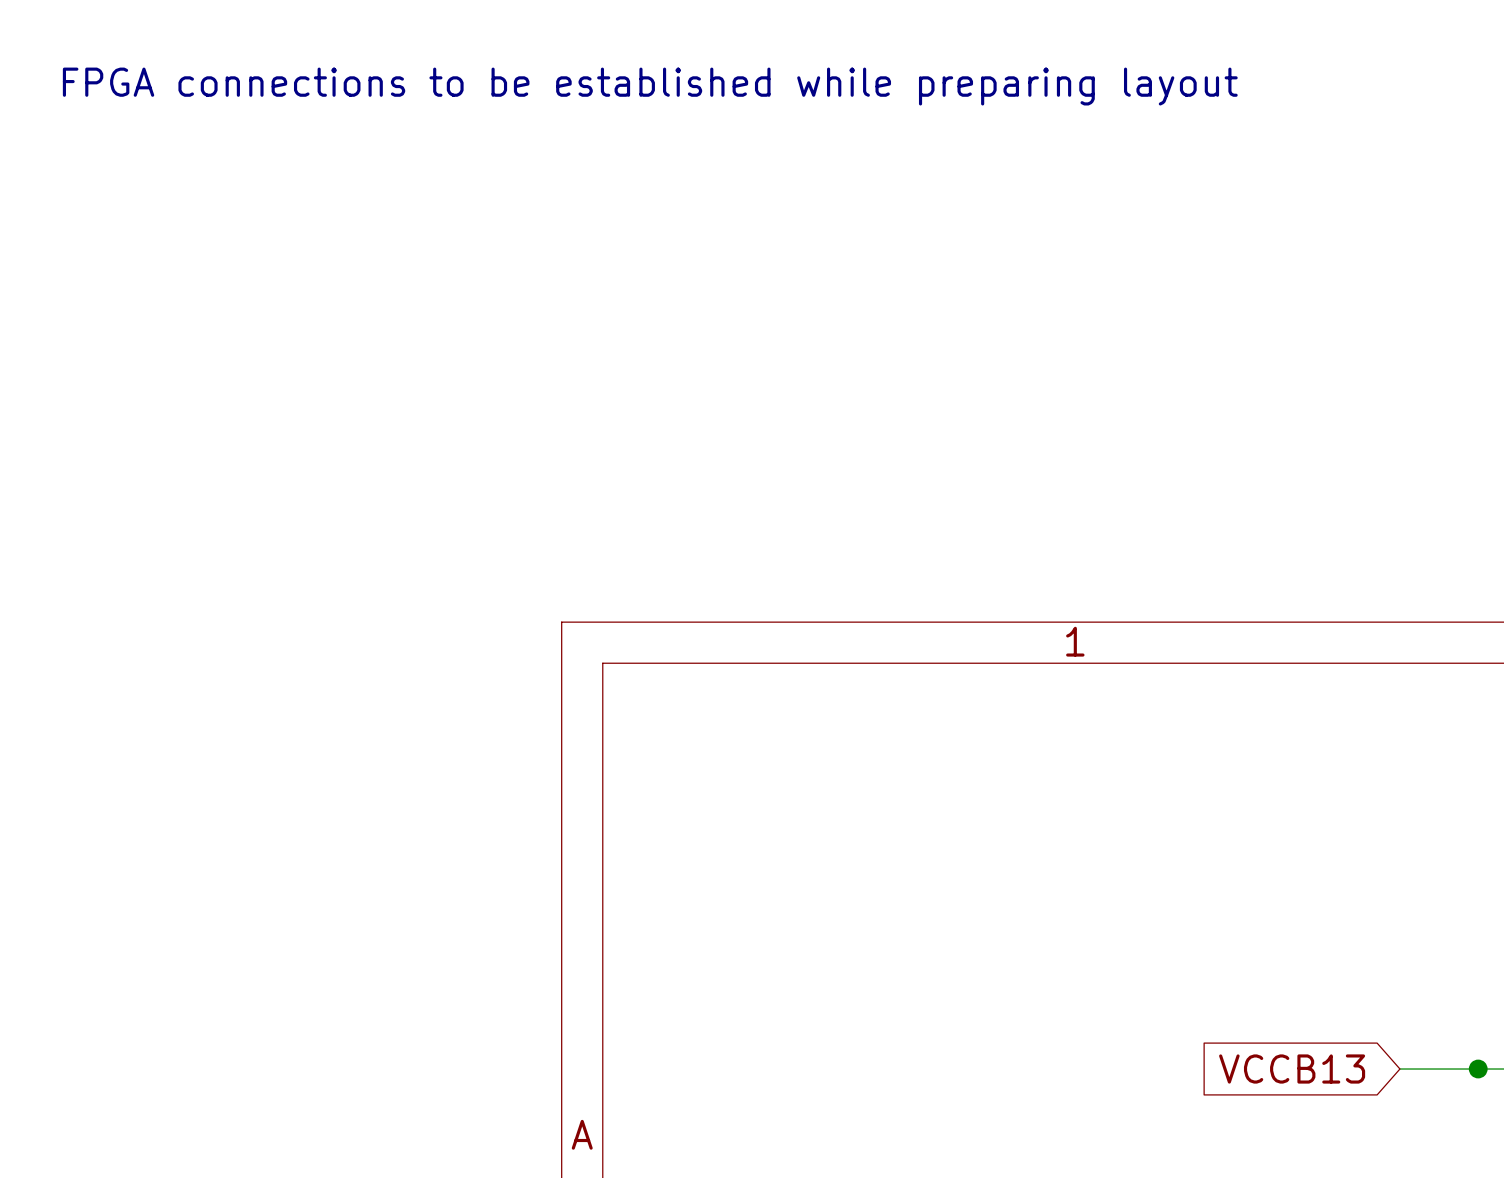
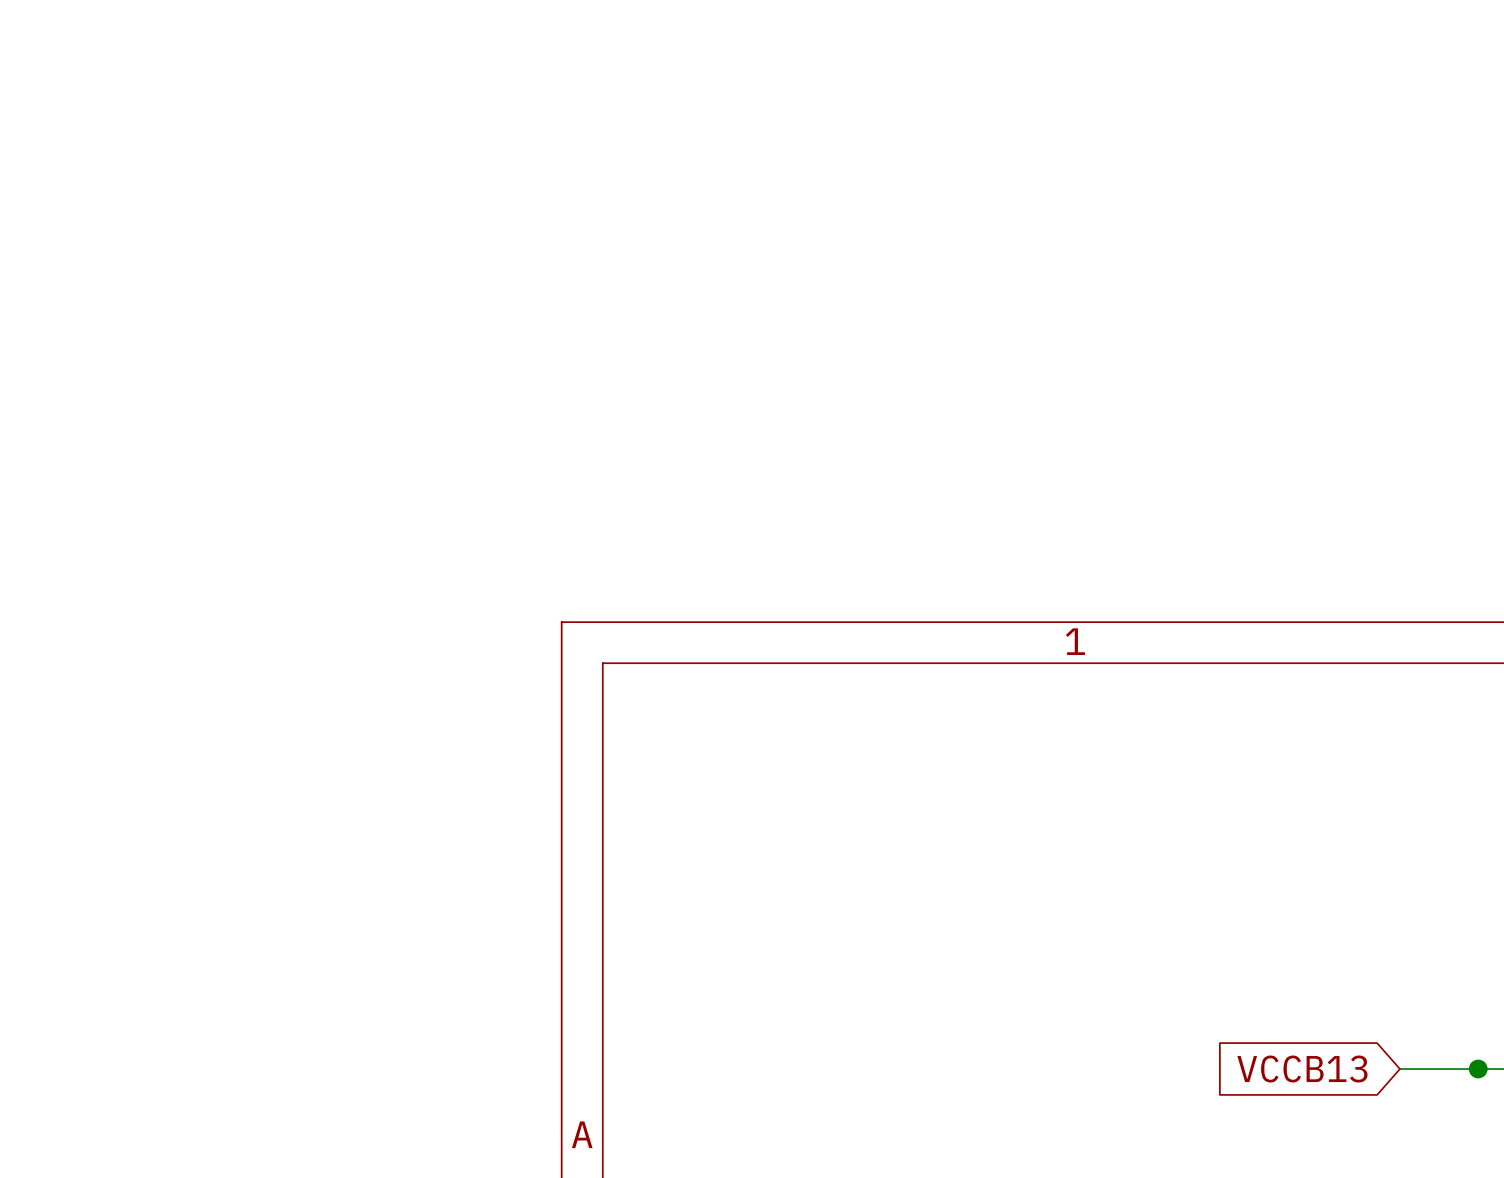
text: FPGA connections to be established while preparing layout (650, 86) -> none

